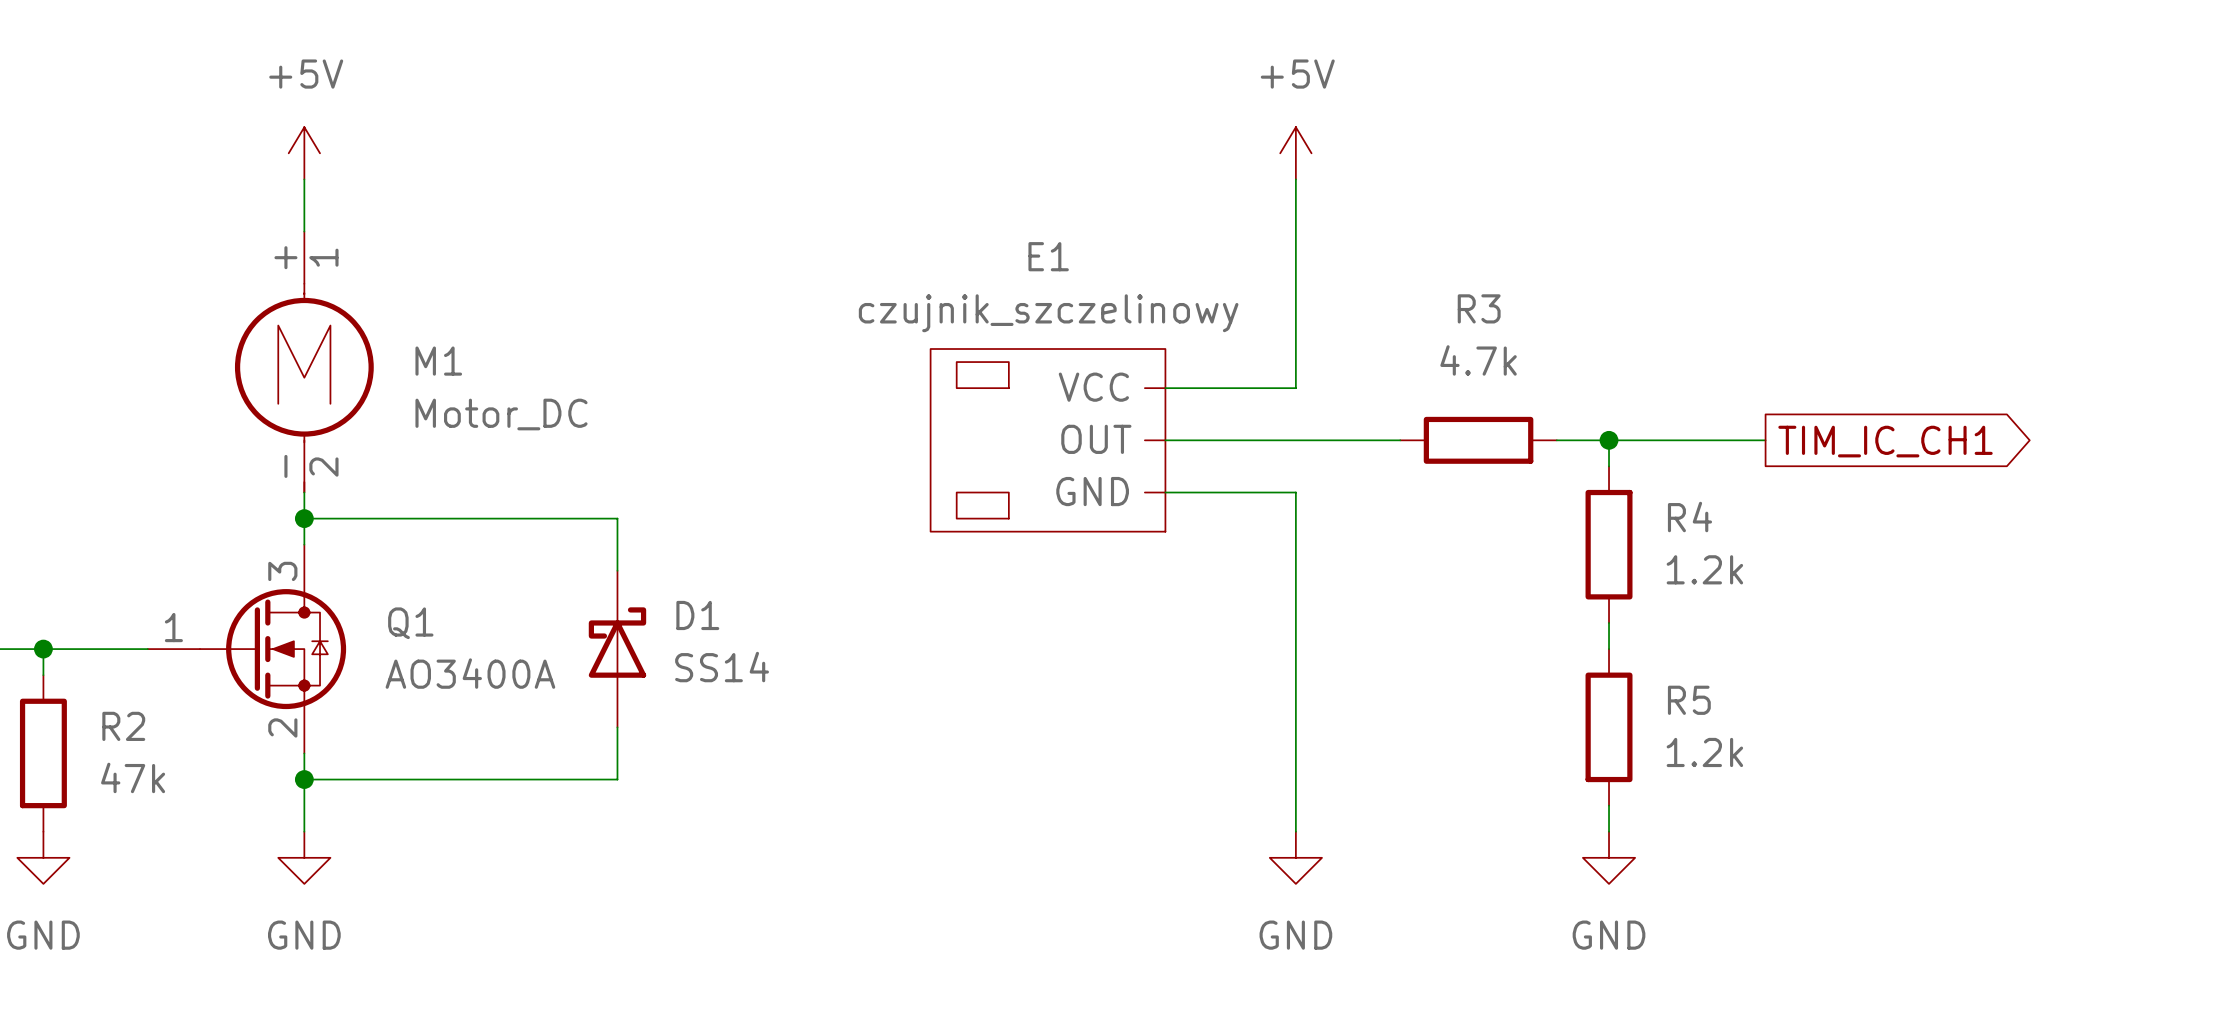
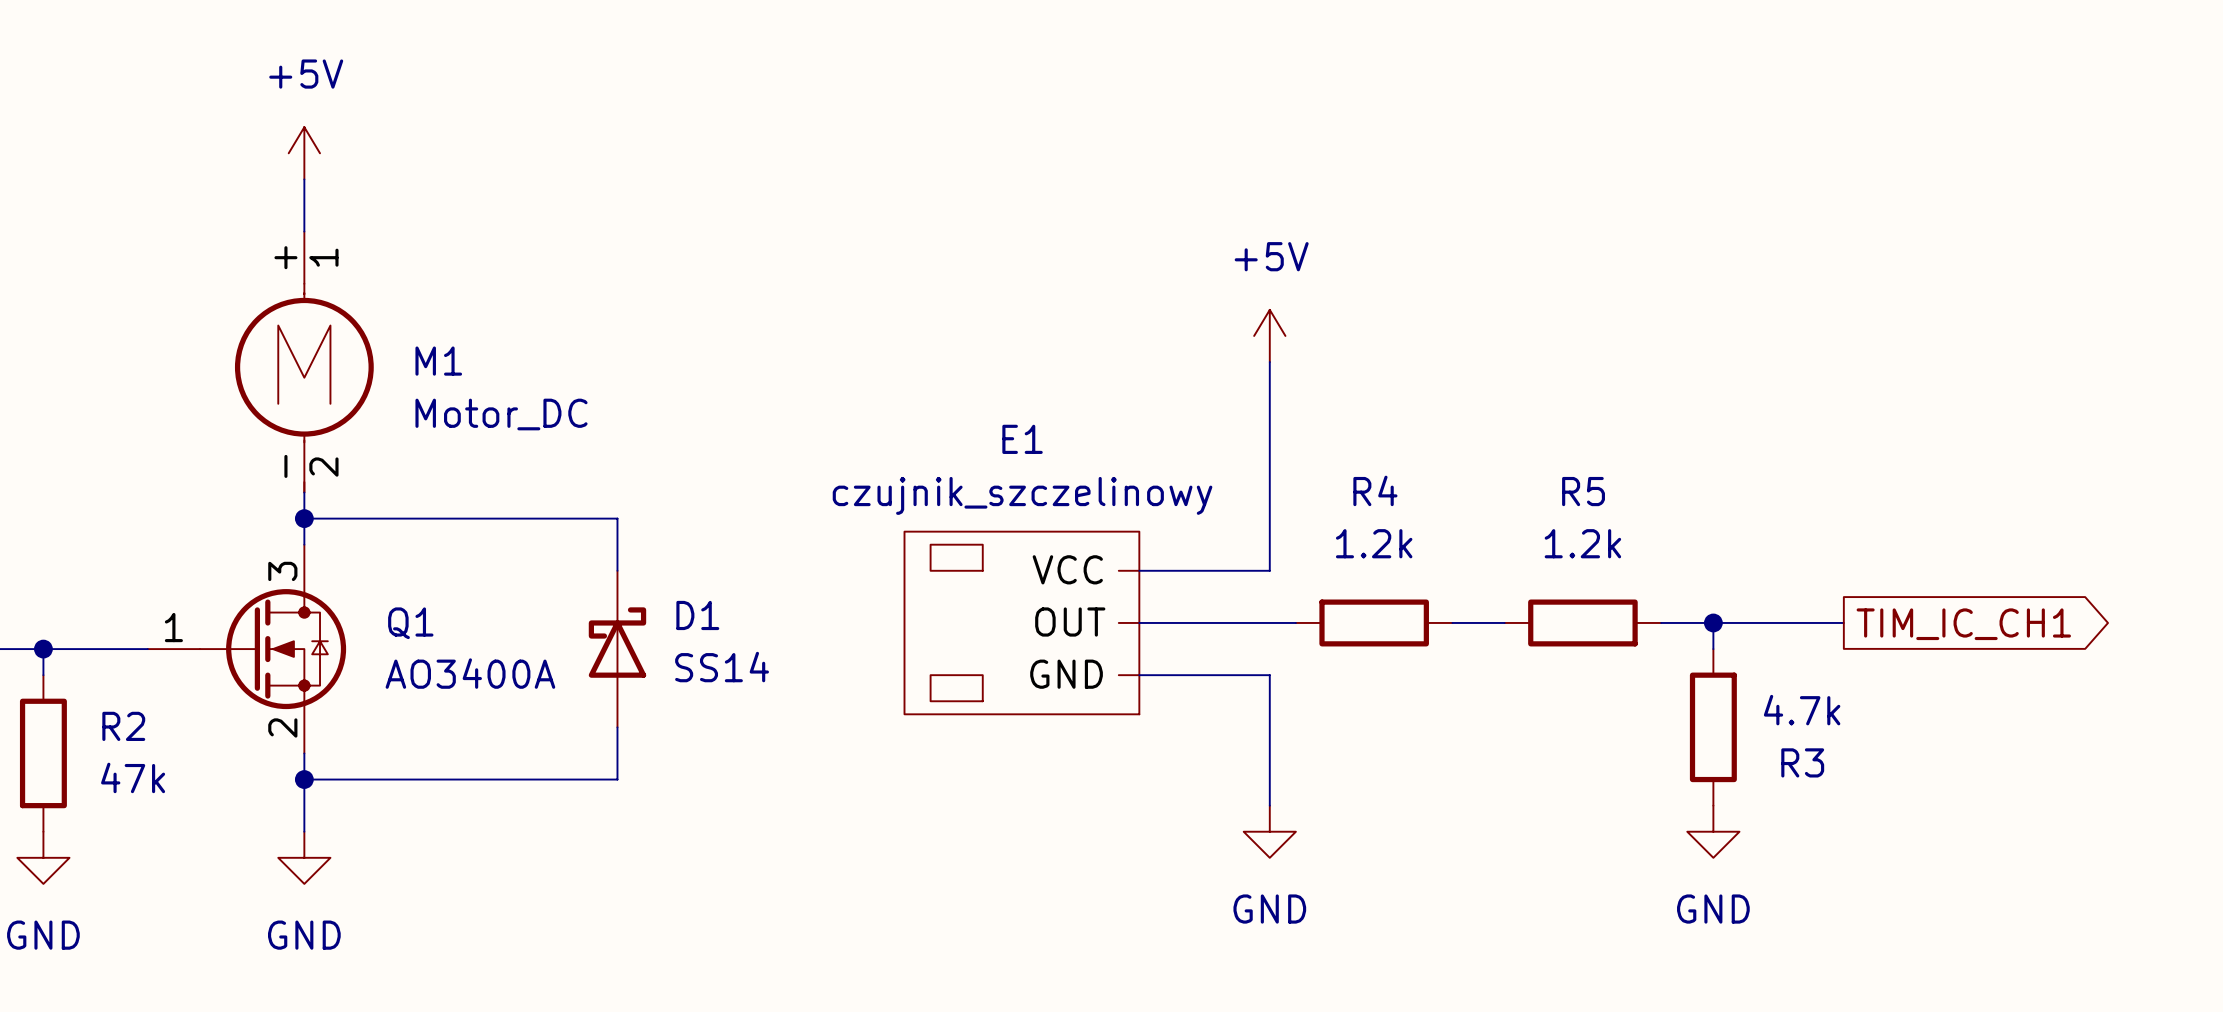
power symbol position: +5V (1295, 153) -> +5V (1269, 335)
wire: (1295, 179) (1295, 388) (1165, 388) -> (1269, 362) (1269, 570) (1139, 570)
R3 name position: R3 (1479, 308) -> R3 (1802, 762)
E1 position: (1048, 440) -> (1021, 622)
wire: (1165, 440) (1400, 440) -> none
R3 rotation: 0° (1478, 440) -> 90° clockwise (1713, 727)
R3 position: (1478, 440) -> (1713, 727)
wire: (1556, 440) (1765, 440) -> none
wire: (1609, 440) (1609, 466) -> none
junction: (1609, 440) -> none
global label position: TIM_IC_CH1 (1885, 441) -> TIM_IC_CH1 (1963, 624)
wire: (1165, 492) (1295, 492) (1295, 831) -> none
R4 name position: R4 (1689, 517) -> R4 (1375, 490)
R4 rotation: 0° (1609, 544) -> 90° clockwise (1374, 622)
R4 position: (1609, 544) -> (1374, 622)
R4 value position: 1.2k (1704, 569) -> 1.2k (1374, 543)
wire: none -> (1139, 622) (1295, 622)
wire: none -> (1452, 622) (1504, 622)
wire: (1609, 622) (1609, 649) -> (1713, 622) (1713, 649)
wire: none -> (1661, 622) (1843, 622)
junction: none -> (1713, 622)
wire: none -> (1139, 675) (1269, 675) (1269, 805)
R5 name position: R5 (1689, 700) -> R5 (1583, 491)
R5 rotation: 0° (1609, 727) -> 90° clockwise (1582, 622)
R5 position: (1609, 727) -> (1582, 622)
R5 value position: 1.2k (1704, 752) -> 1.2k (1582, 543)
wire: (1609, 805) (1609, 831) -> none
power symbol position: GND (1295, 857) -> GND (1269, 831)
power symbol position: GND (1609, 857) -> GND (1713, 831)

